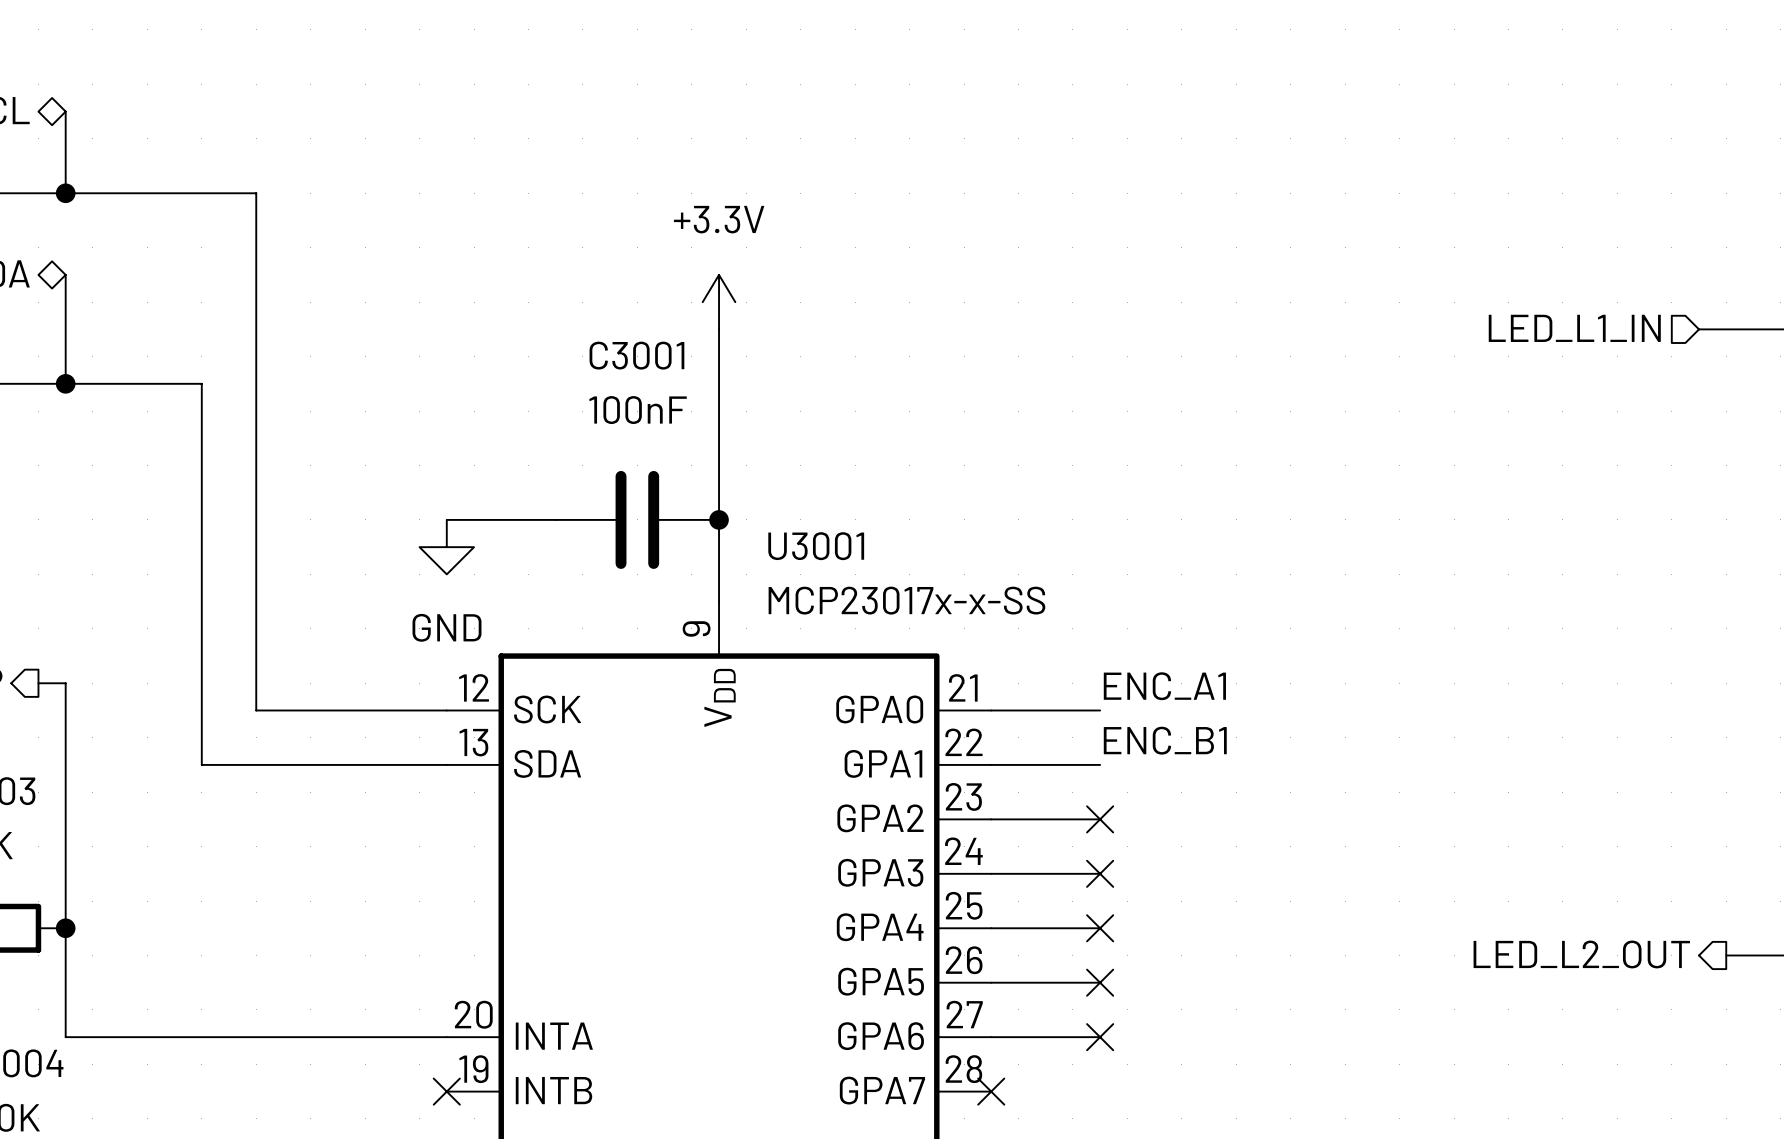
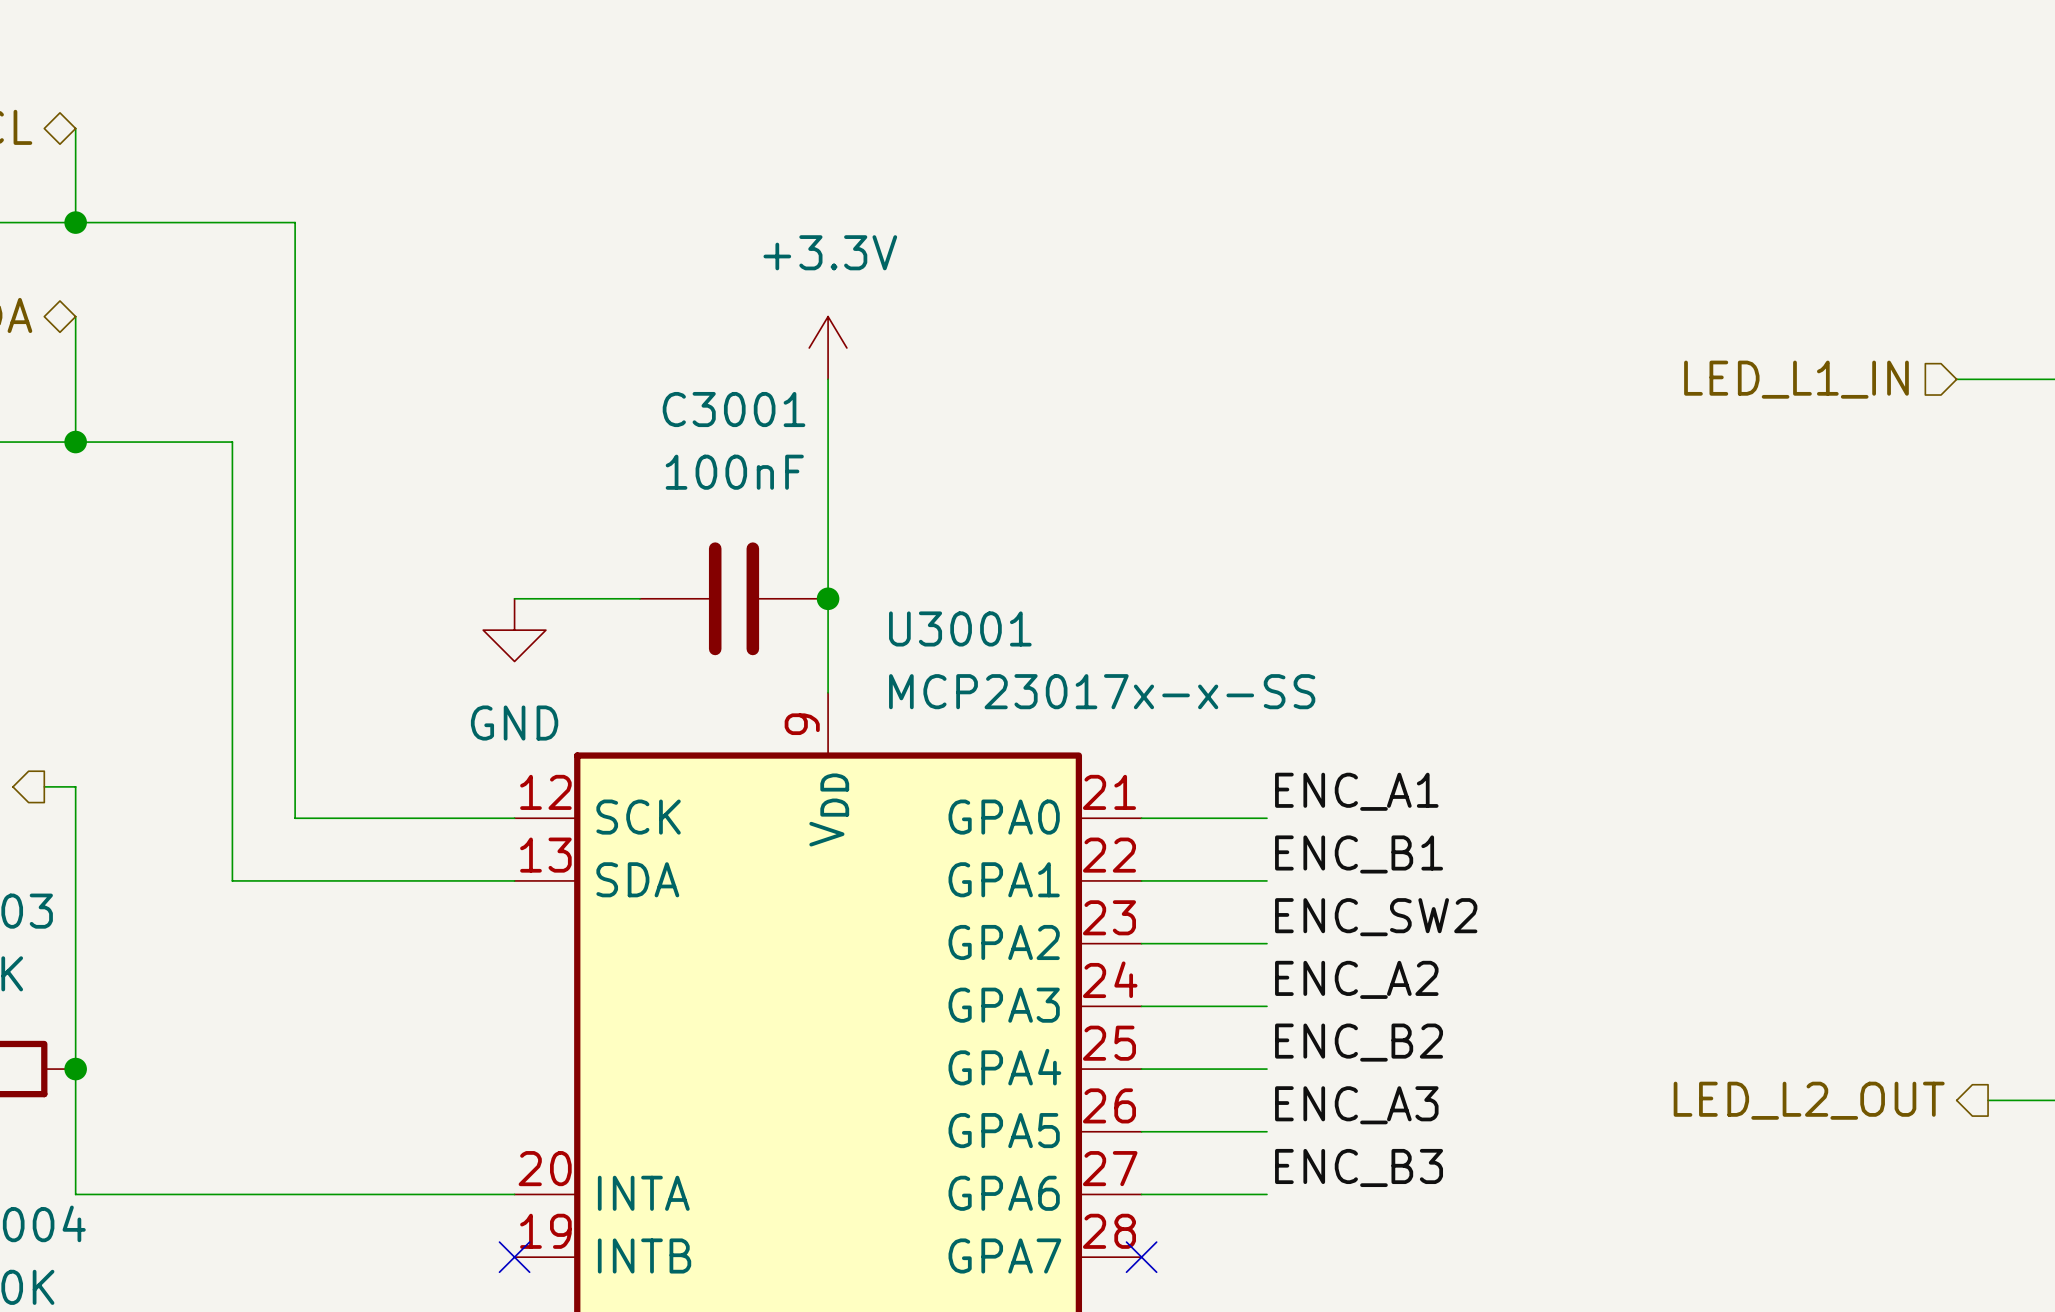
label: none -> ENC_SW2 (1376, 917)
no-connect mark: (1100, 819) -> none
label: none -> ENC_A2 (1356, 979)
no-connect mark: (1100, 873) -> none
label: none -> ENC_B2 (1359, 1042)
no-connect mark: (1100, 928) -> none
label: none -> ENC_A3 (1356, 1105)
no-connect mark: (1100, 982) -> none
label: none -> ENC_B3 (1359, 1167)
no-connect mark: (1100, 1037) -> none

